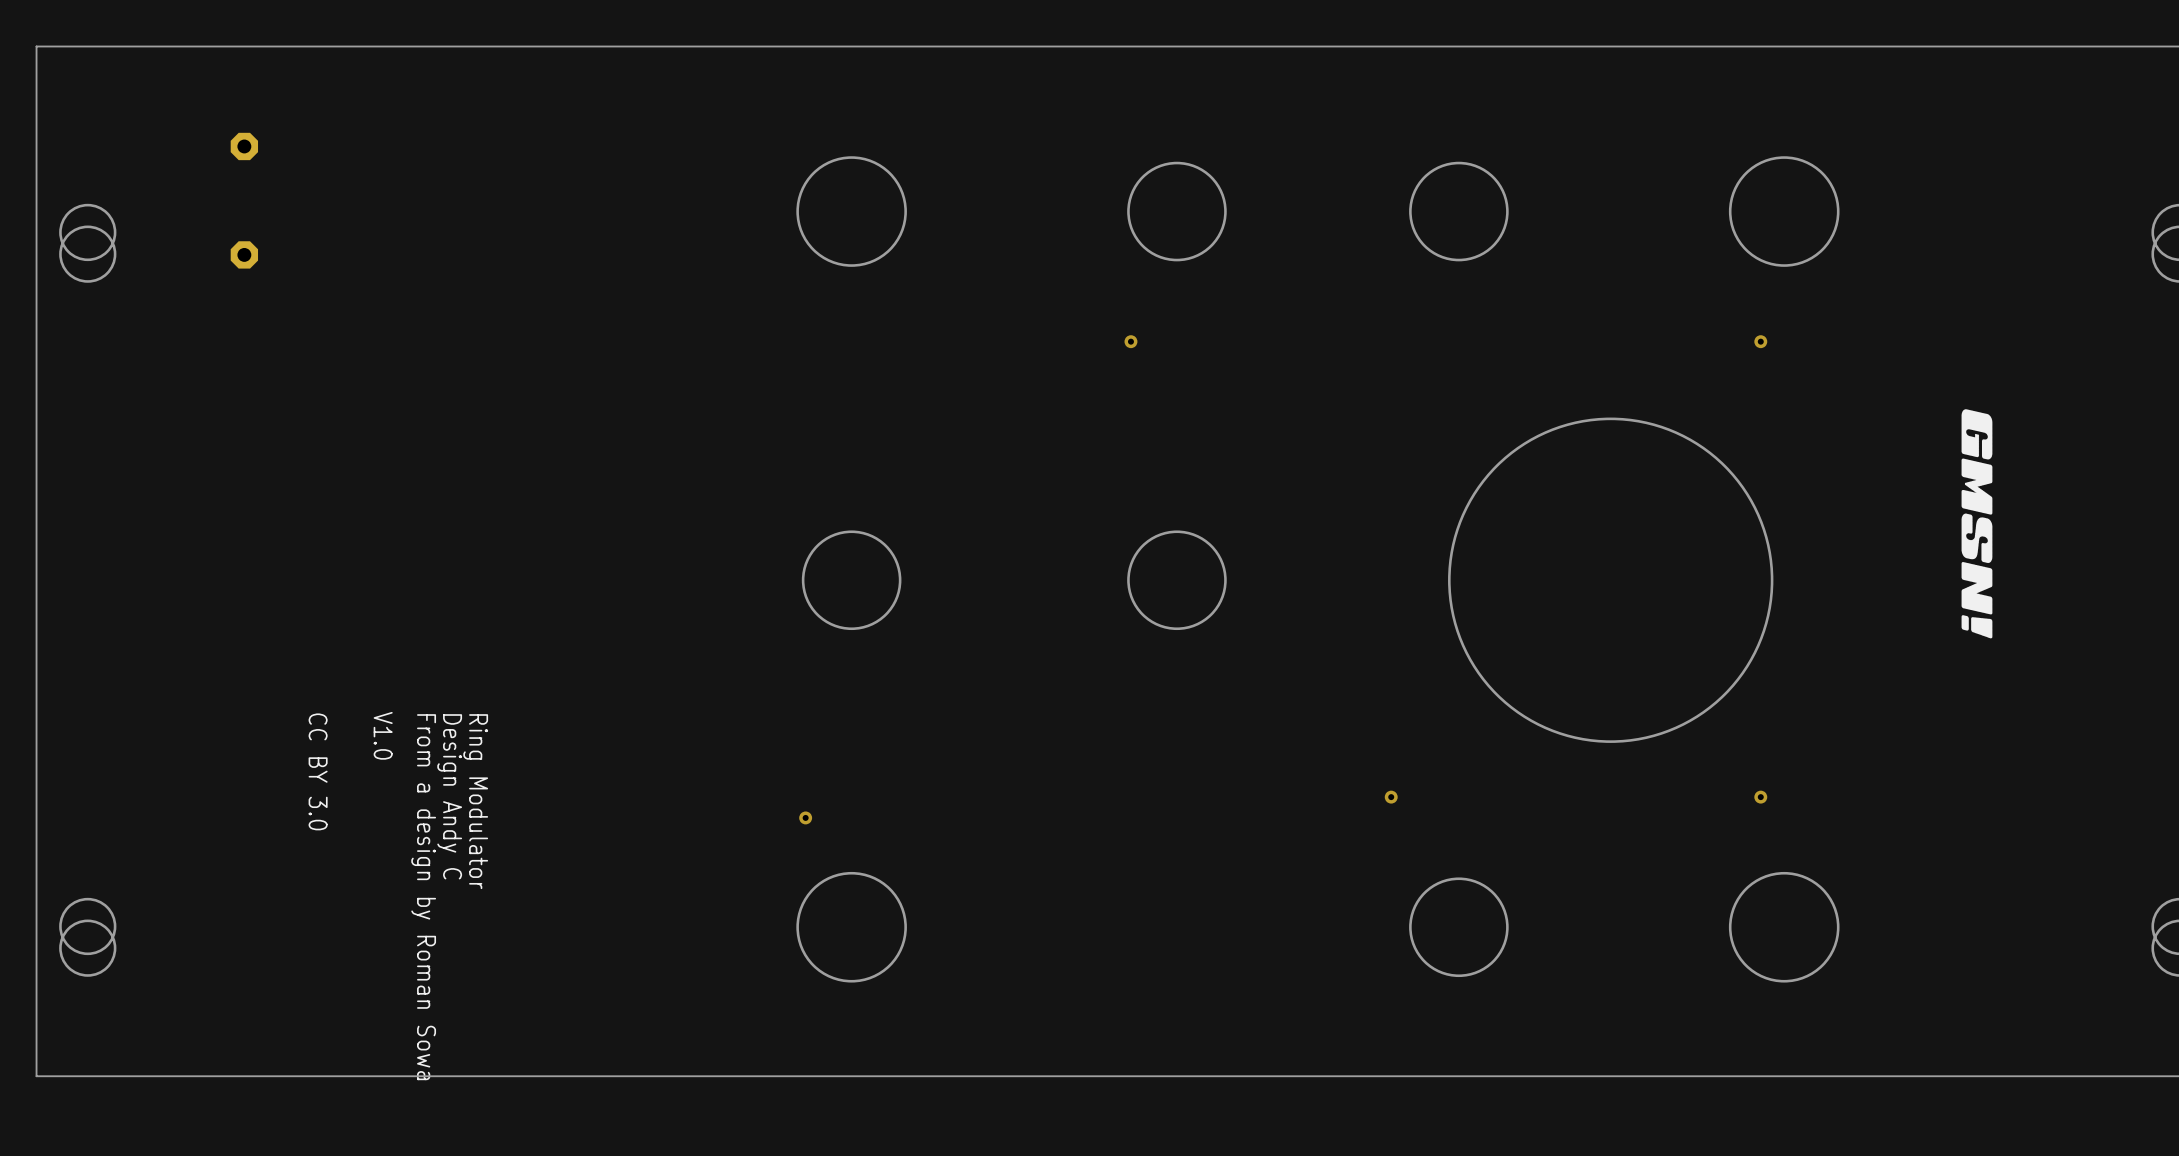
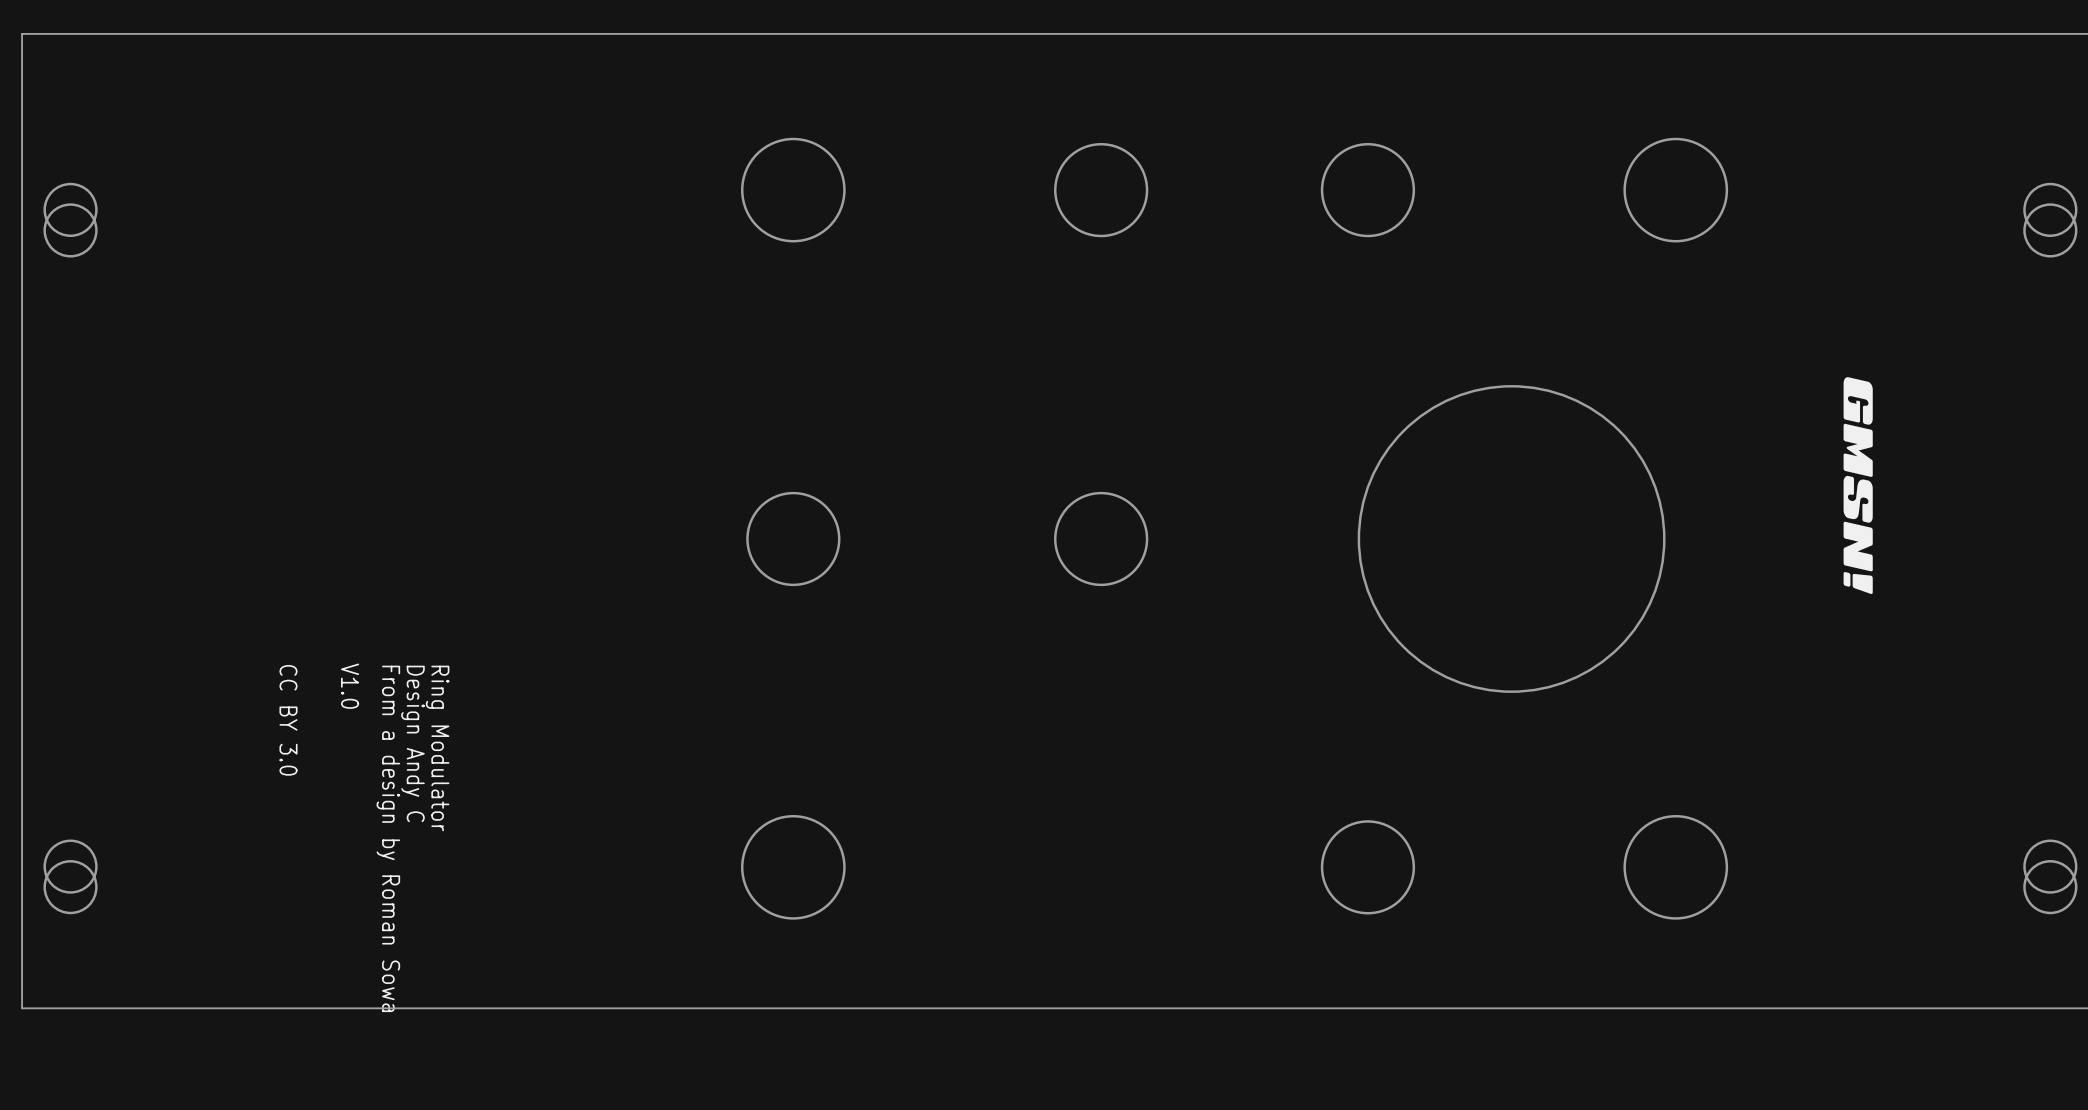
part: (244, 146) -> none
part: (244, 254) -> none
via: (1130, 341) -> none
via: (1760, 341) -> none
via: (1391, 797) -> none
via: (1760, 797) -> none
via: (805, 817) -> none

